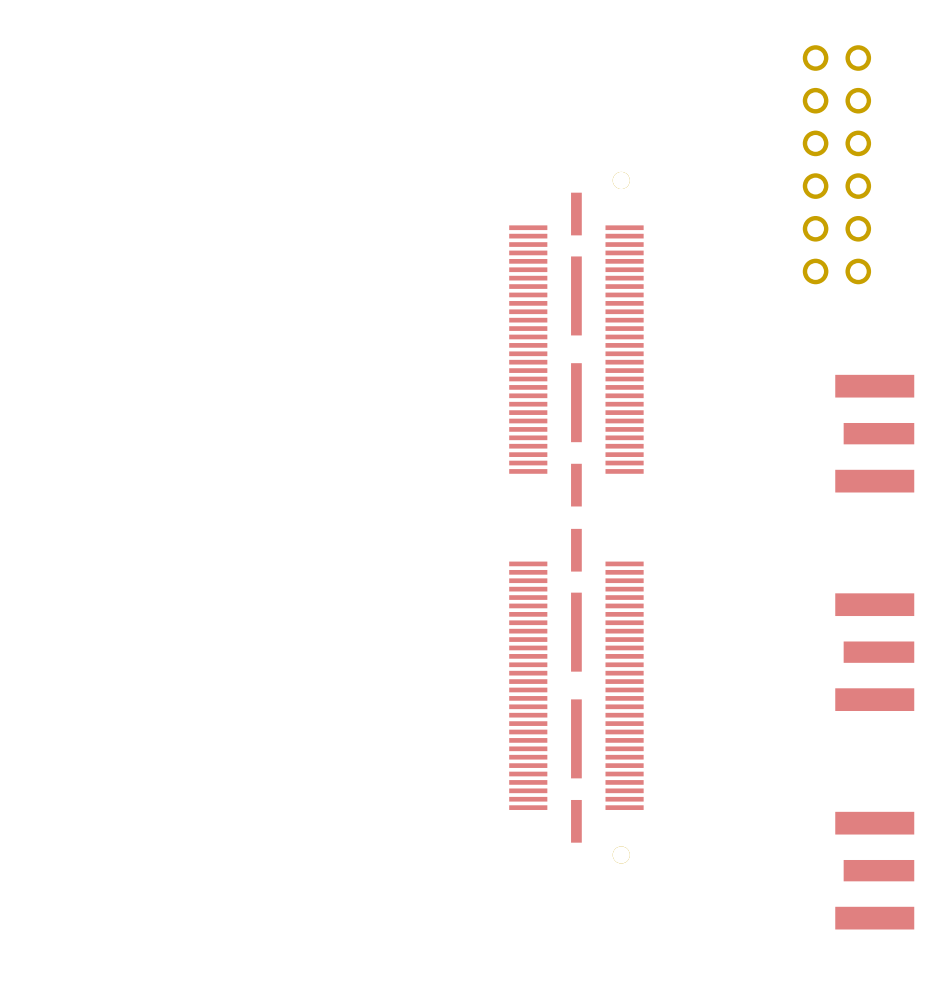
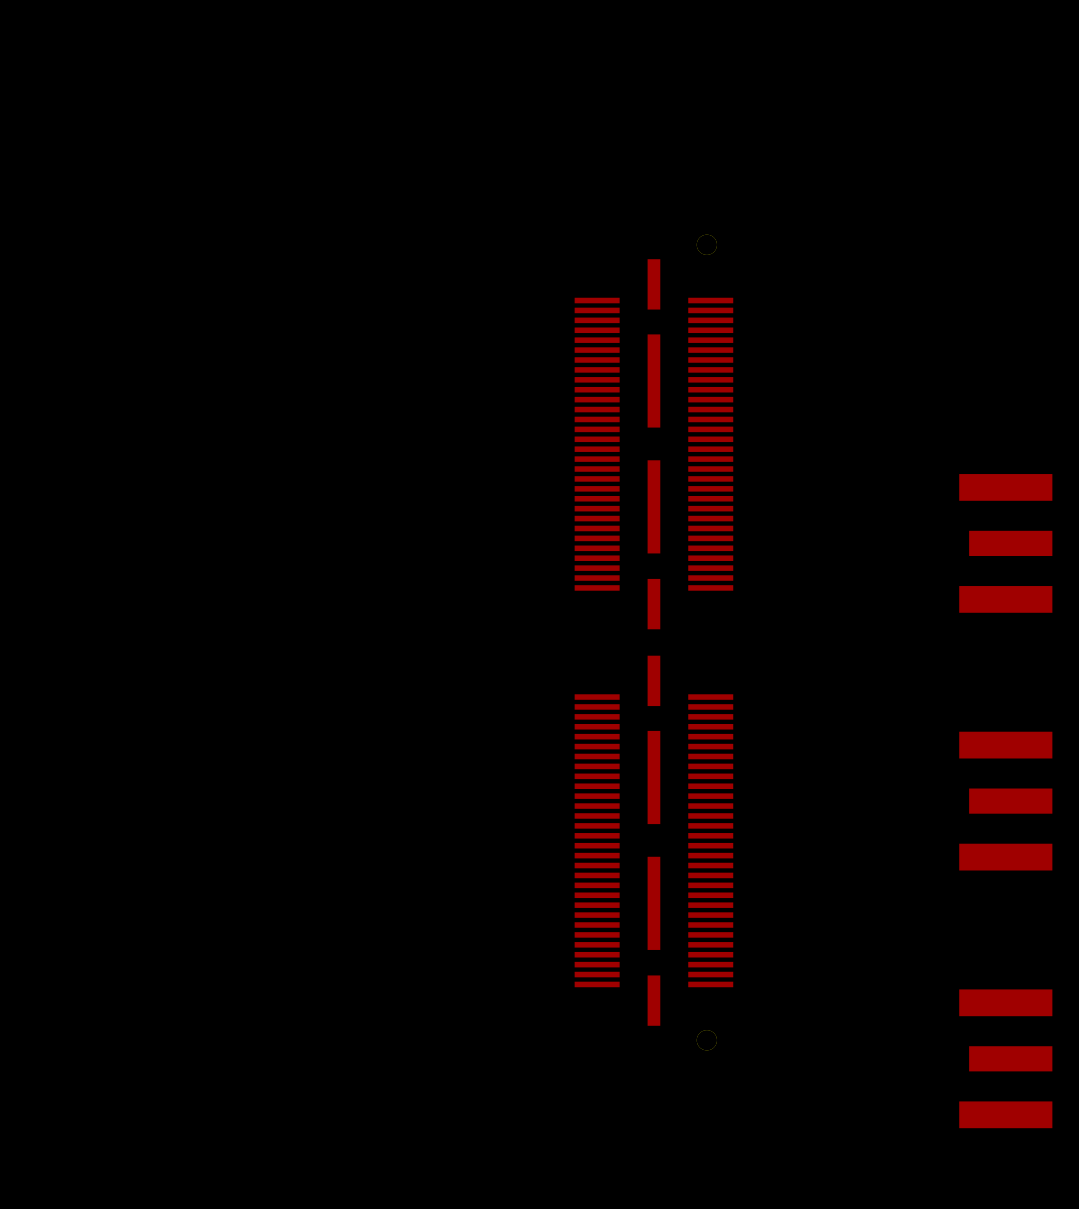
part: (836, 164) -> none

